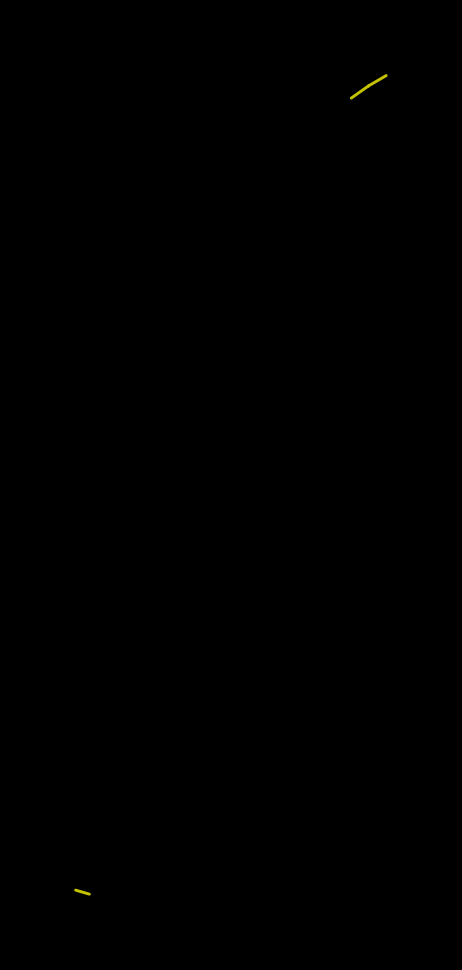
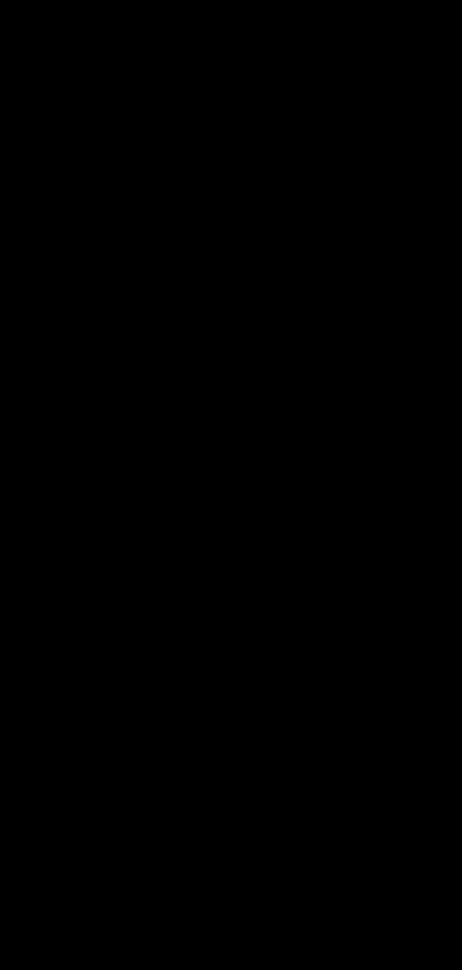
board edge: (386, 75) (351, 98) -> none
board edge: (75, 890) (89, 894) -> none

